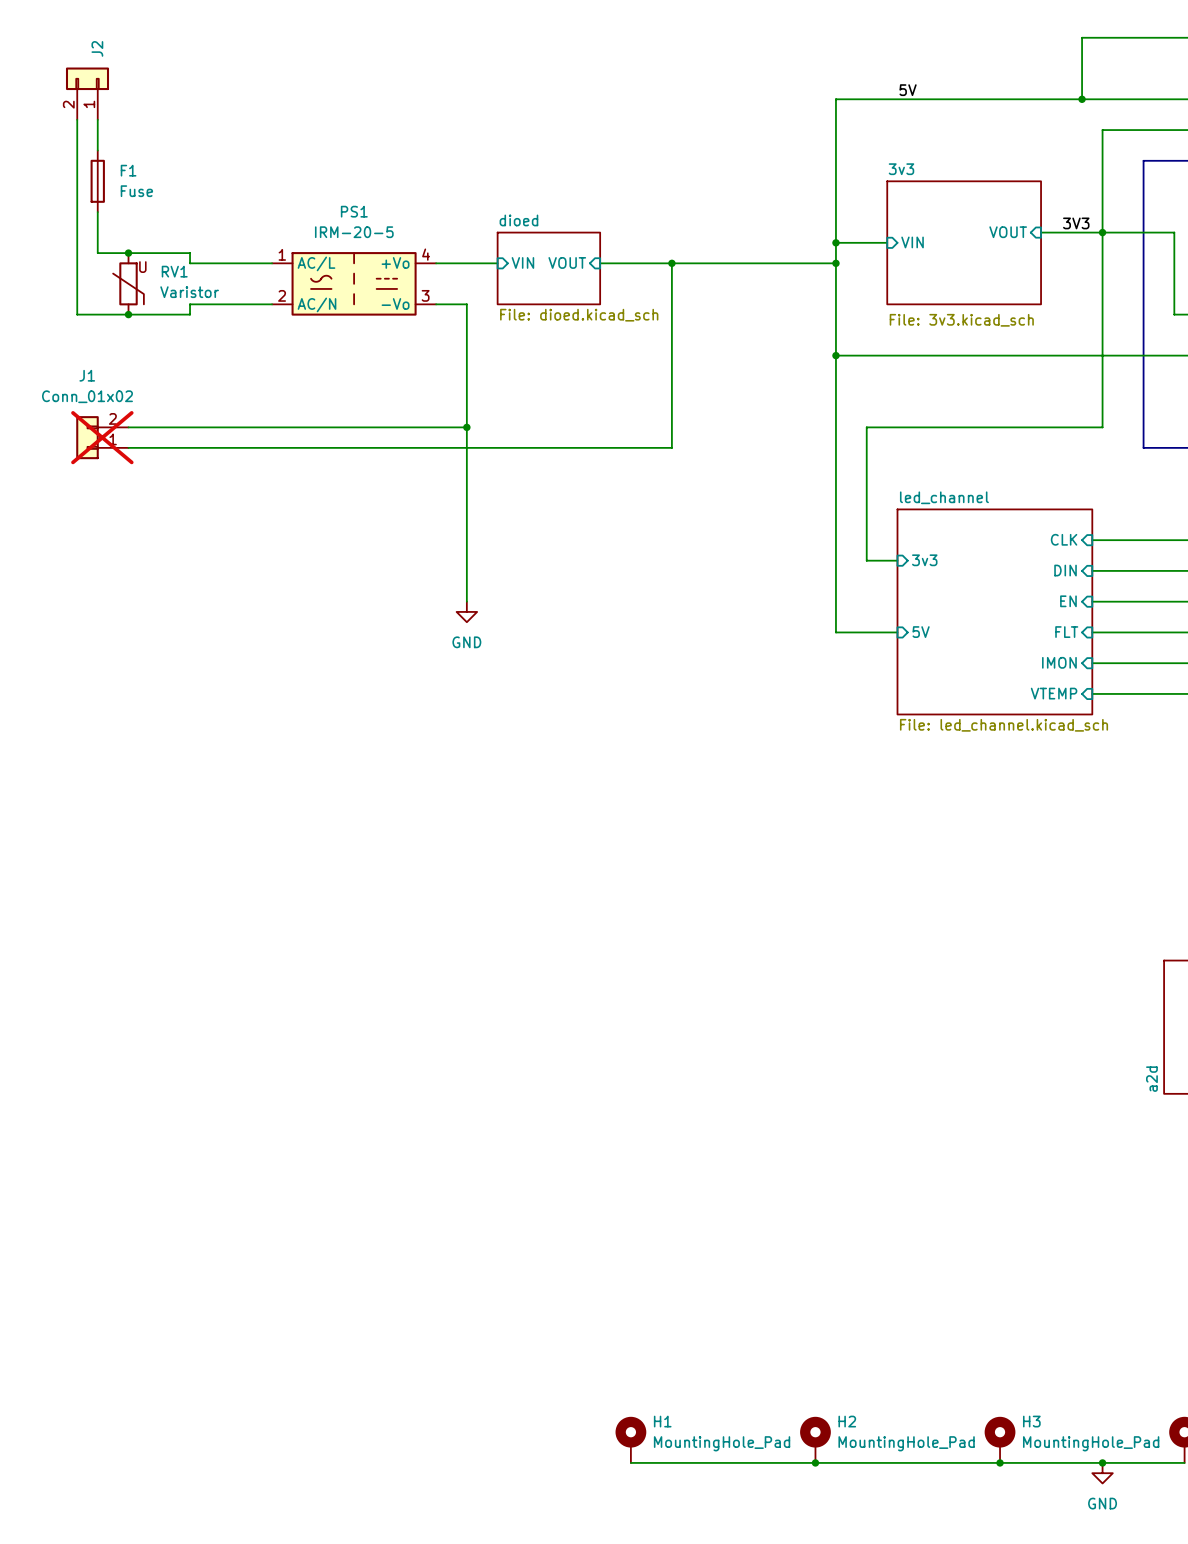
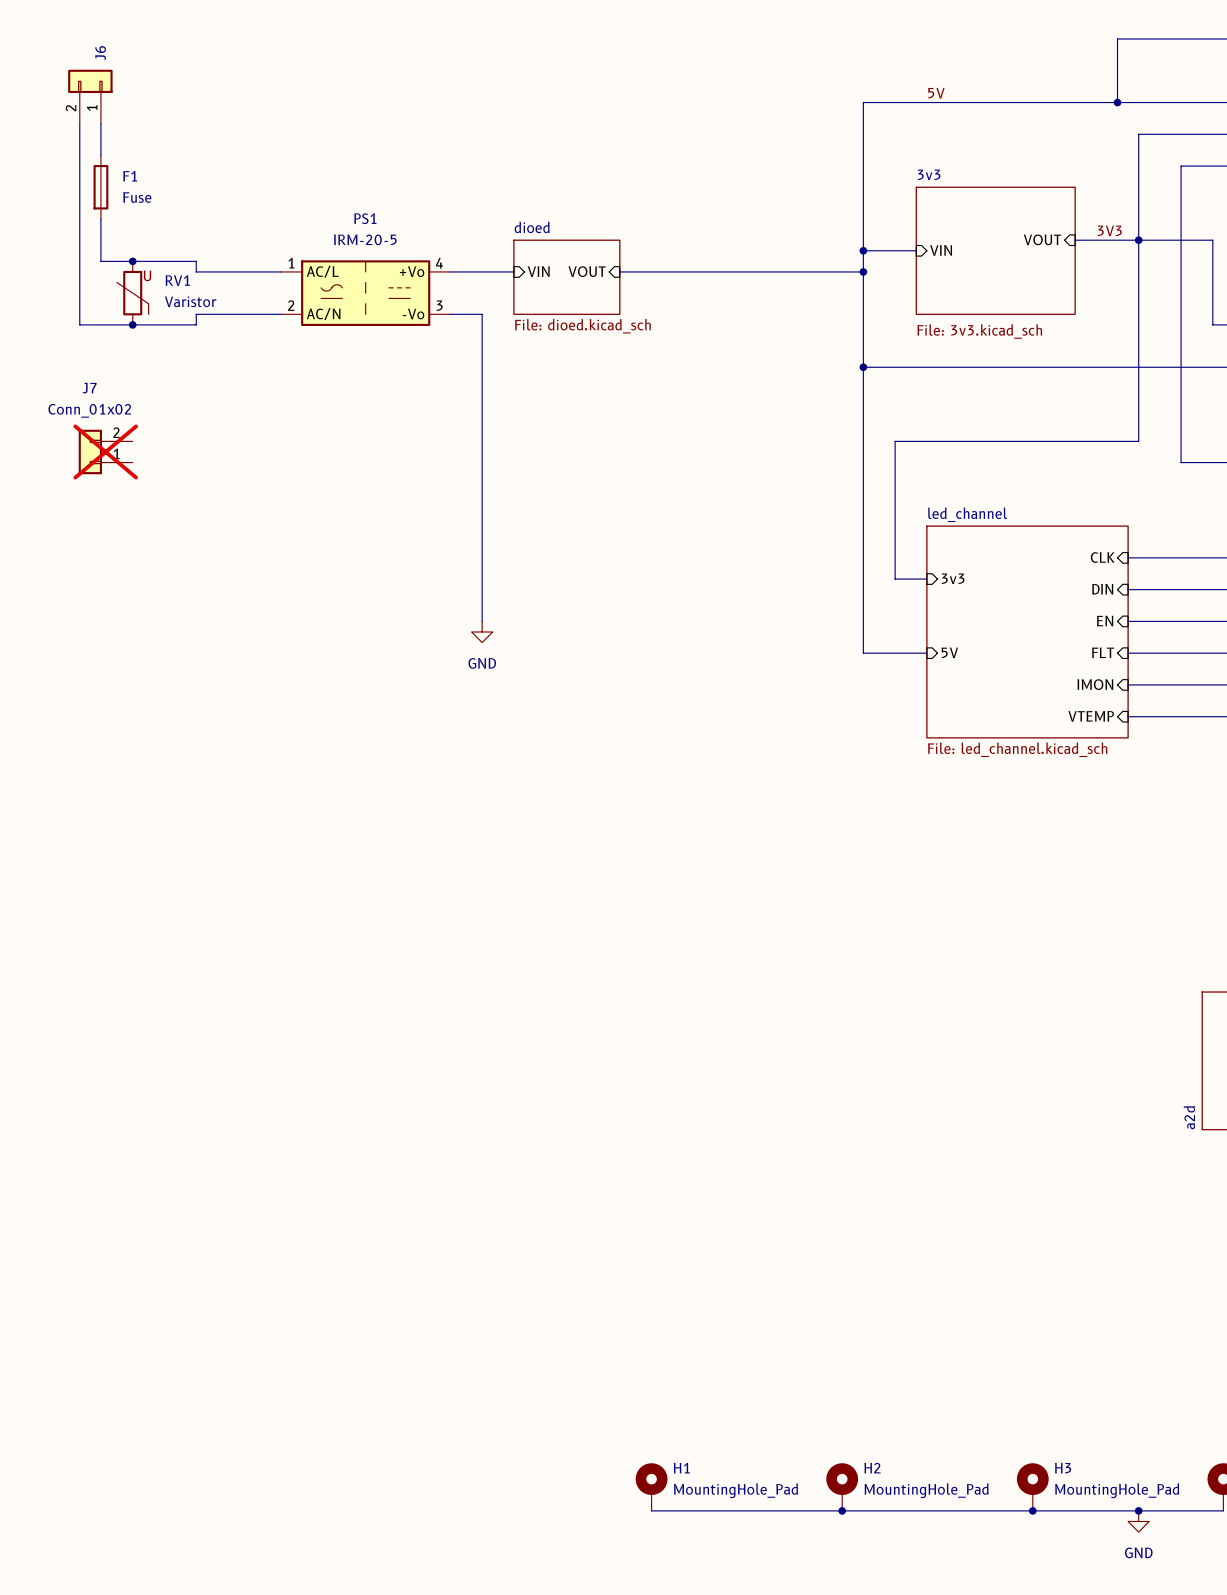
J2 name: J2 (97, 48) -> J6 (100, 53)
wire: (671, 263) (671, 447) (128, 447) -> none
junction: (671, 263) -> none
J1 name: J1 (87, 375) -> J7 (89, 388)
wire: (128, 427) (466, 427) -> none
junction: (466, 427) -> none

